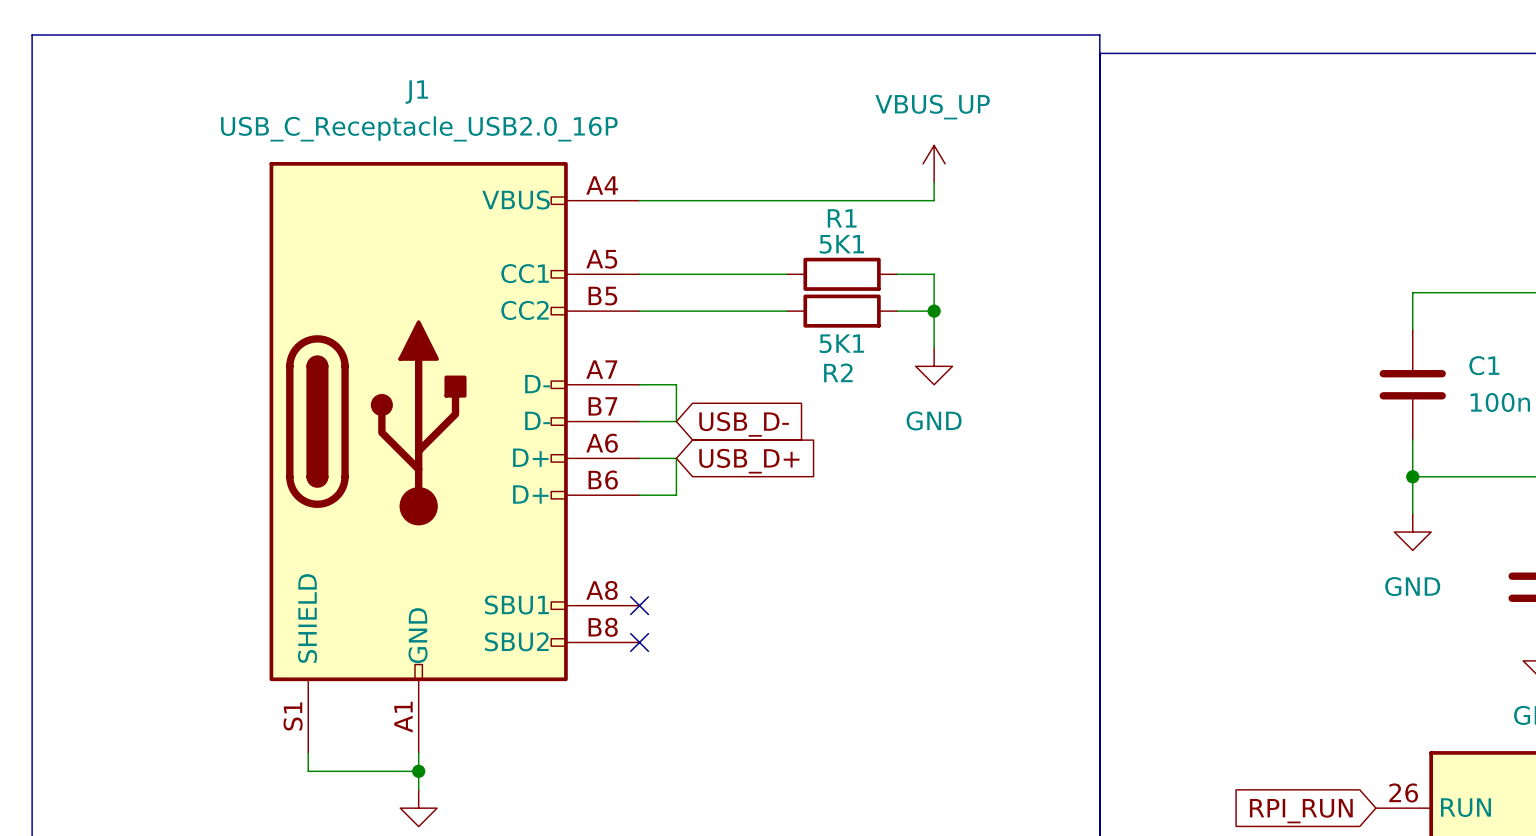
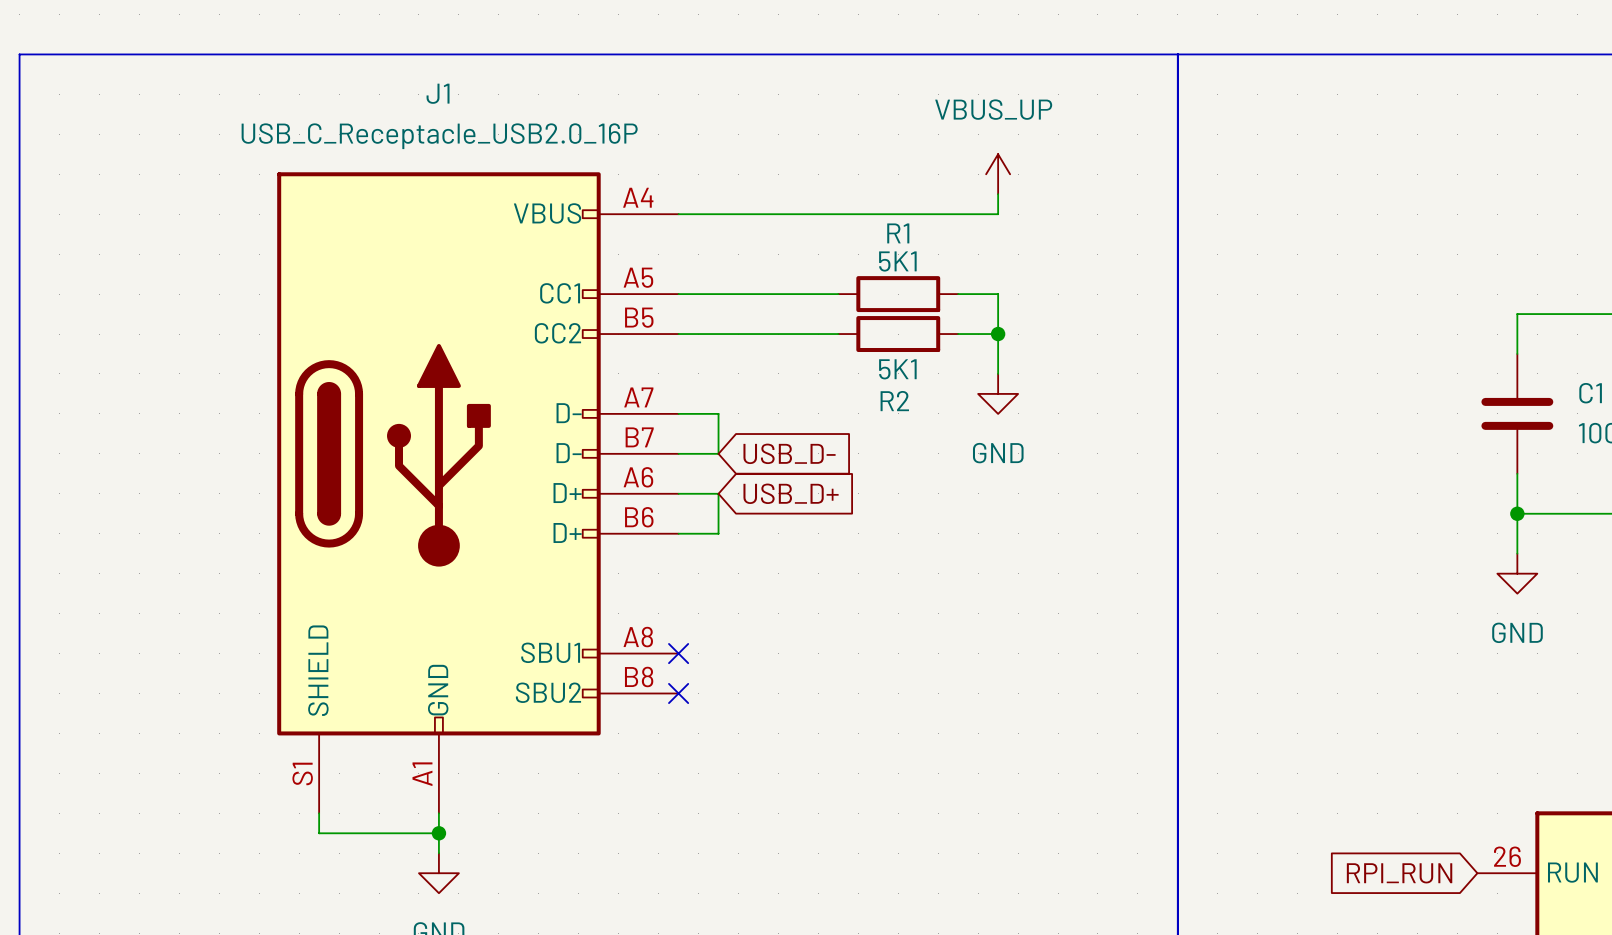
line: (32, 53) (32, 34) (1099, 34) (1099, 53) -> (19, 54) (1177, 54)

